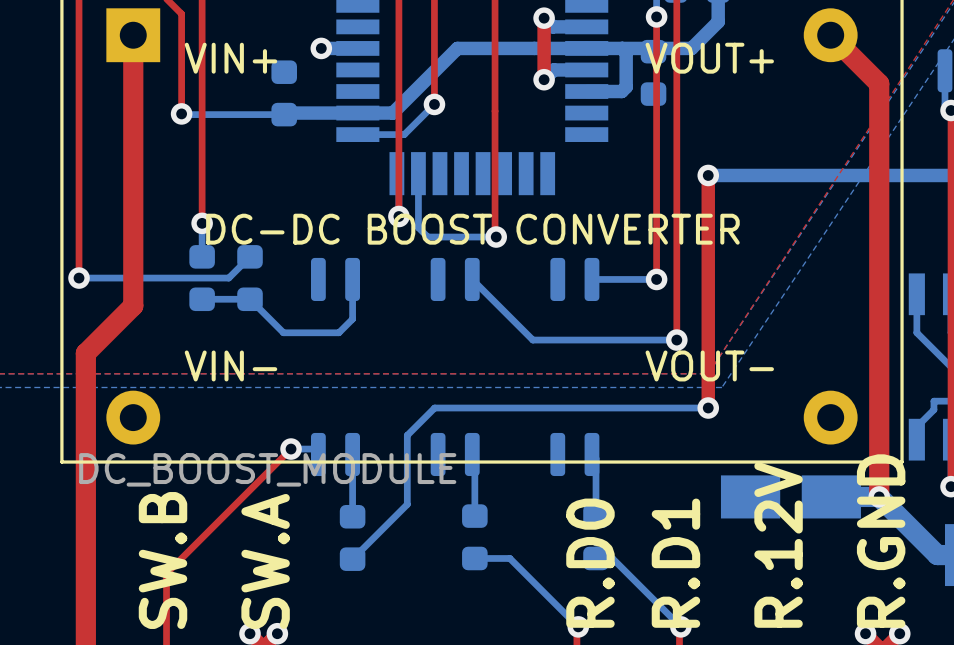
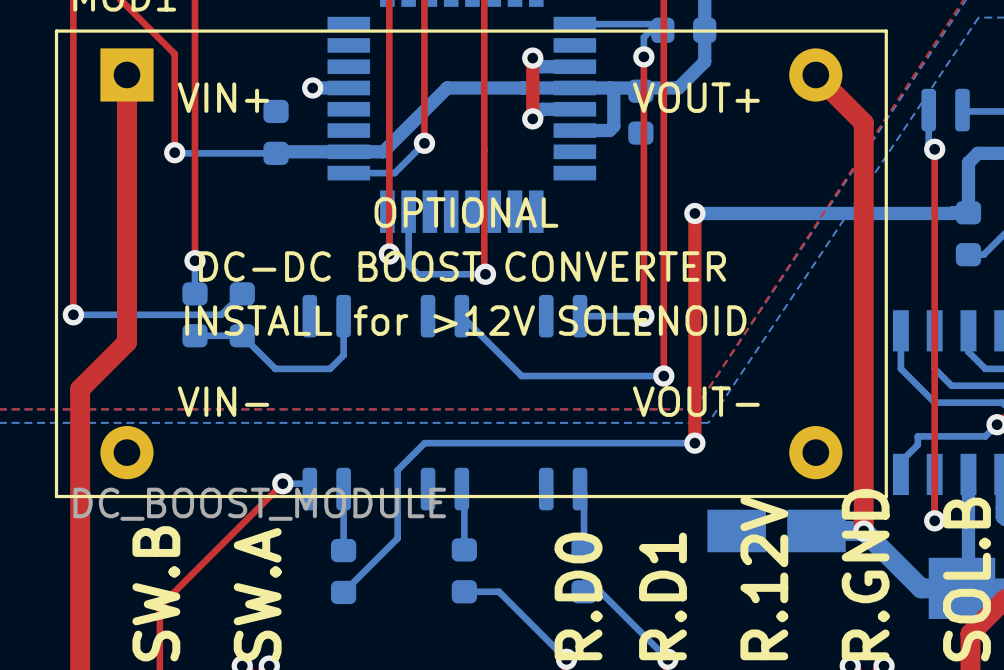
text: none -> OPTIONAL (466, 212)
text: none -> INSTALL for >12V SOLENOID (465, 320)

